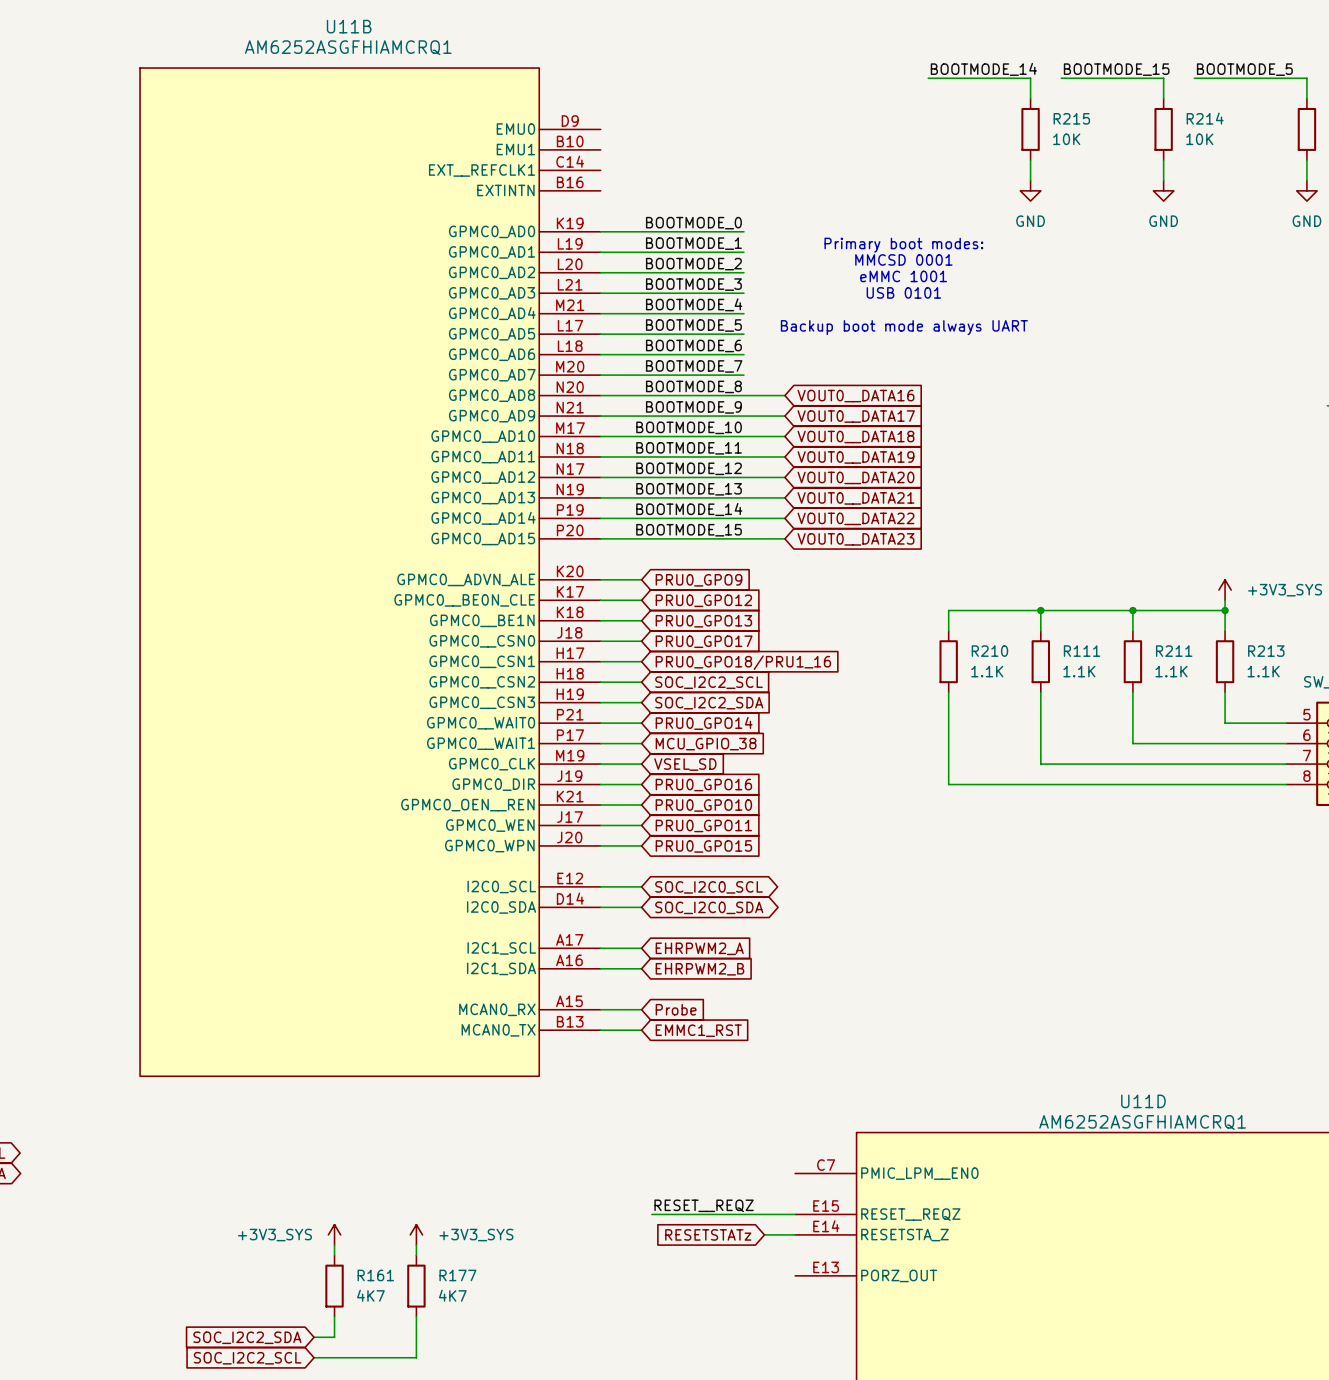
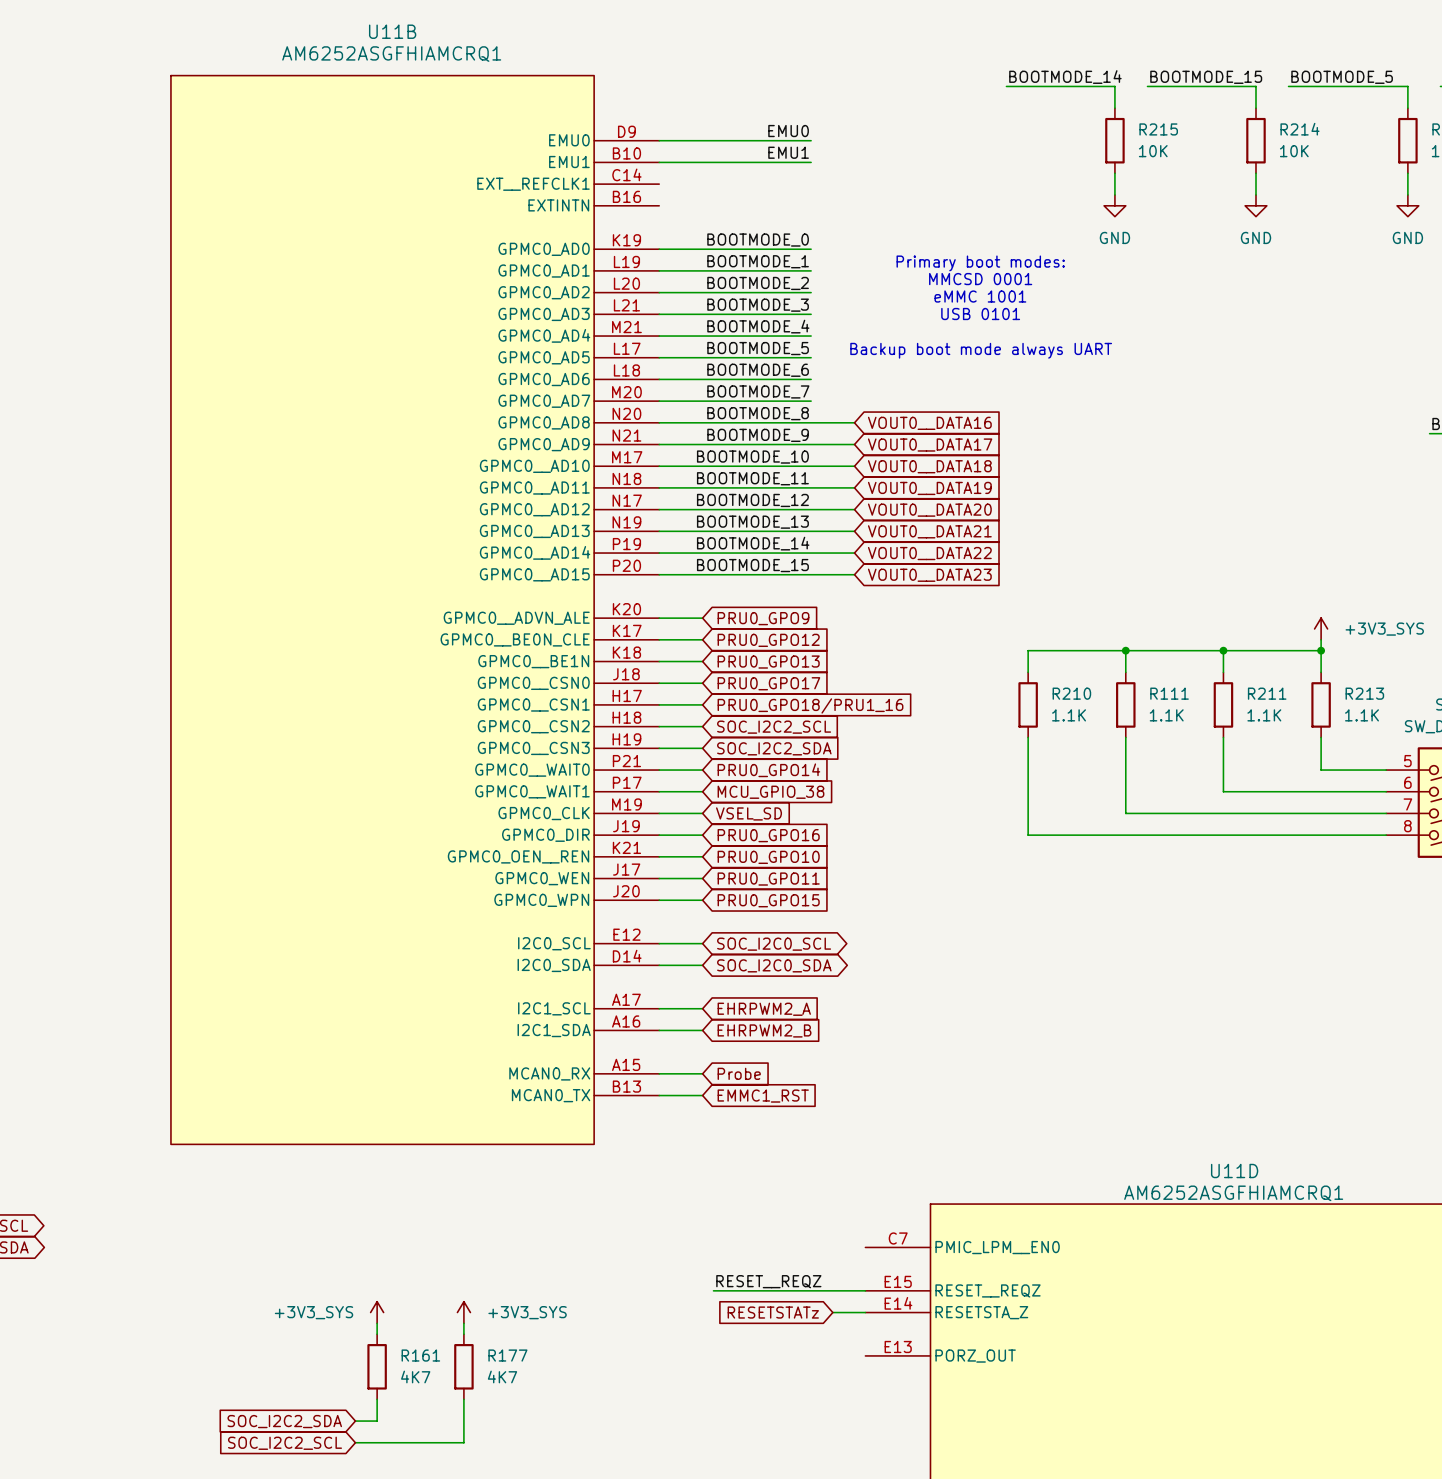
label: none -> EMU0 (788, 131)
wire: none -> (659, 140) (811, 140)
label: none -> EMU1 (788, 152)
wire: none -> (659, 162) (811, 162)

